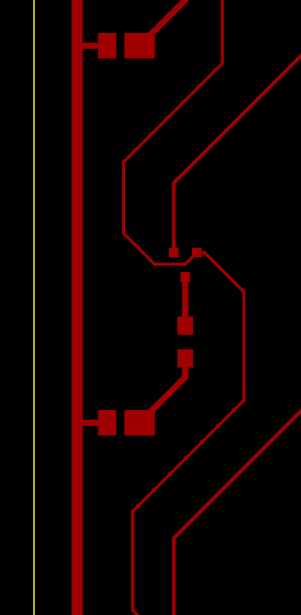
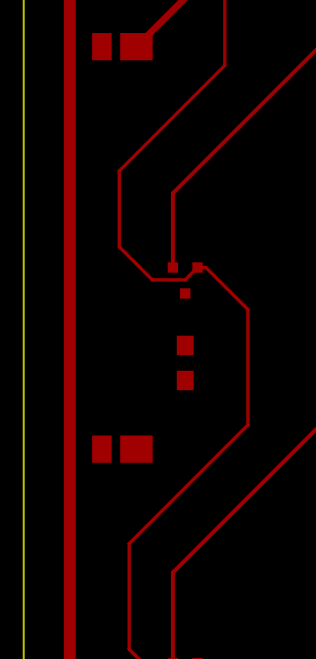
top track: (107, 45) (77, 45) (77, 47) -> none
top track: (185, 276) (185, 325) -> none
top track: (185, 358) (185, 377) (139, 422) -> none
top track: (77, 421) (107, 422) -> none

